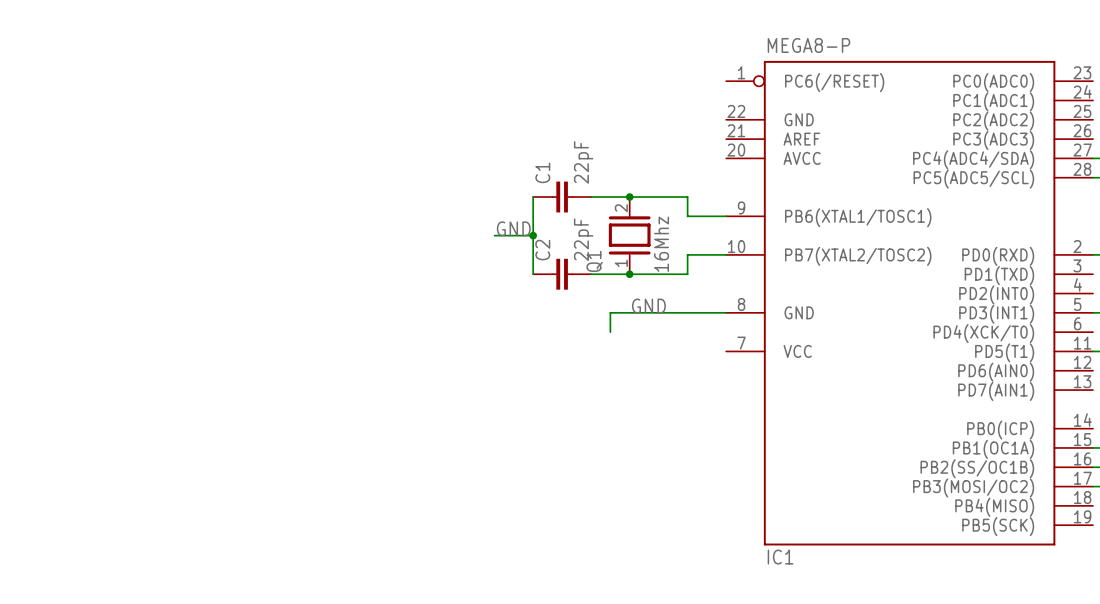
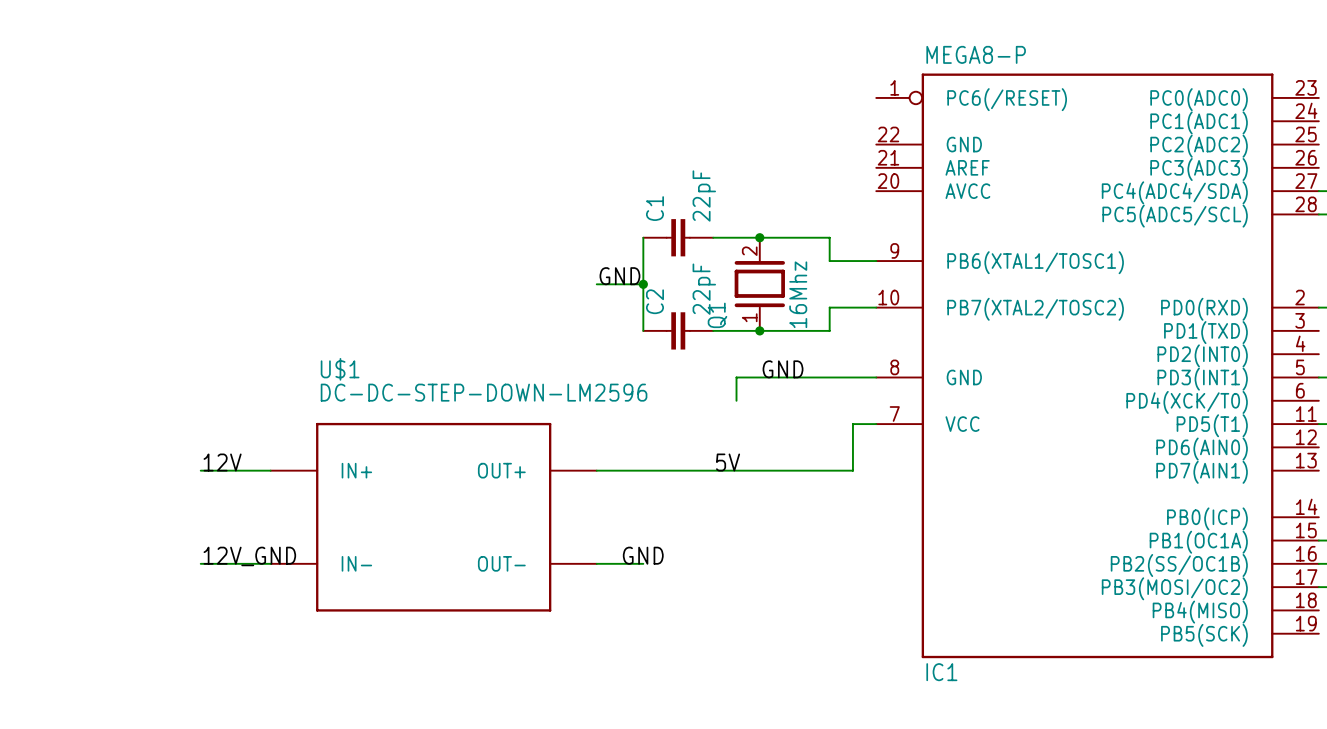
wire: none -> (876, 424) (852, 424) (852, 470) (596, 470)
label: none -> 12V (222, 462)
label: none -> 5V (728, 462)
wire: none -> (200, 470) (270, 470)
U$1: none -> DC-DC-STEP-DOWN-LM2596 (433, 517)
label: none -> GND (643, 555)
label: none -> 12V_GND (249, 556)
wire: none -> (200, 563) (270, 563)
wire: none -> (596, 563) (643, 563)

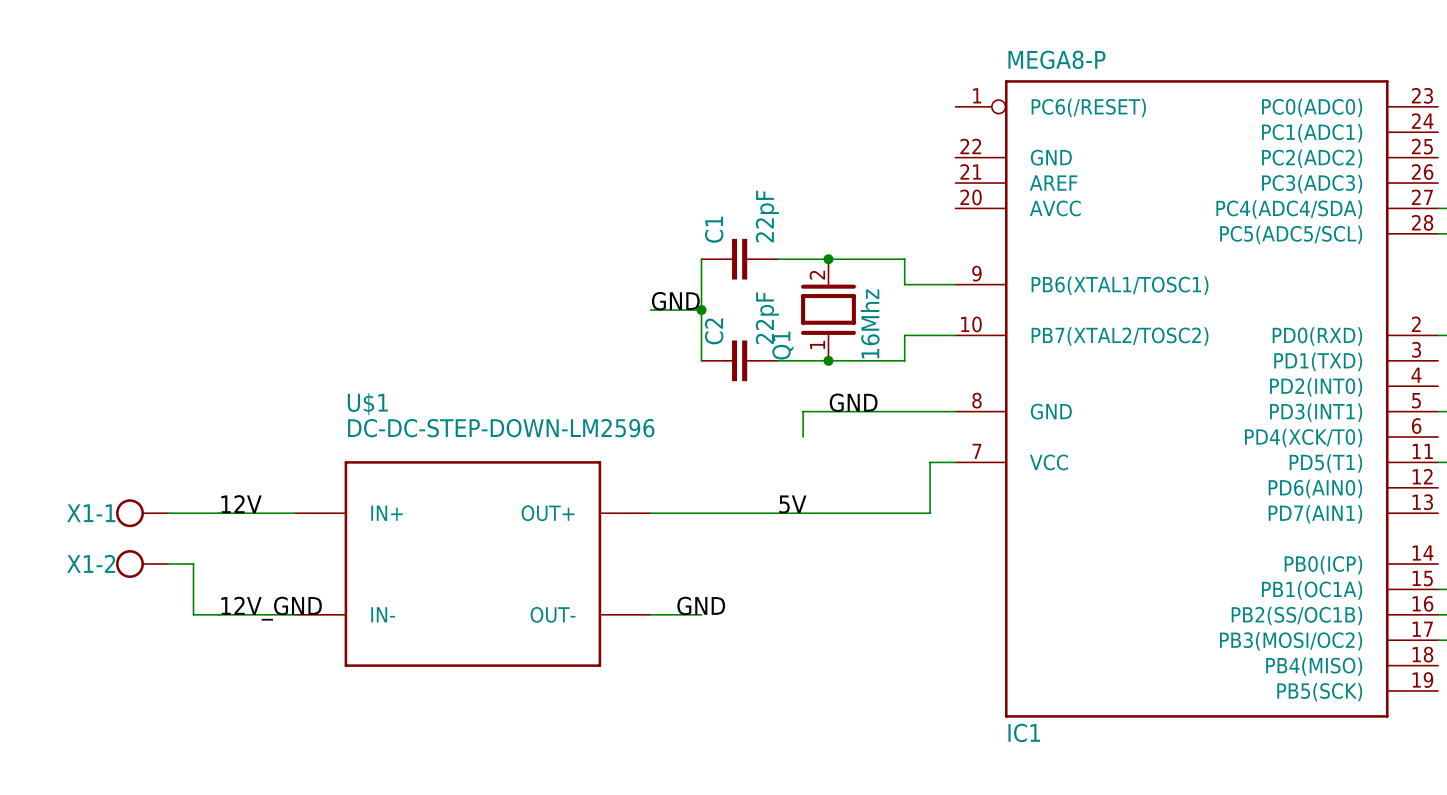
X1-1: none -> (142, 513)
wire: none -> (168, 513) (218, 513)
X1-2: none -> (142, 564)
wire: none -> (168, 564) (193, 564) (193, 614) (218, 614)

